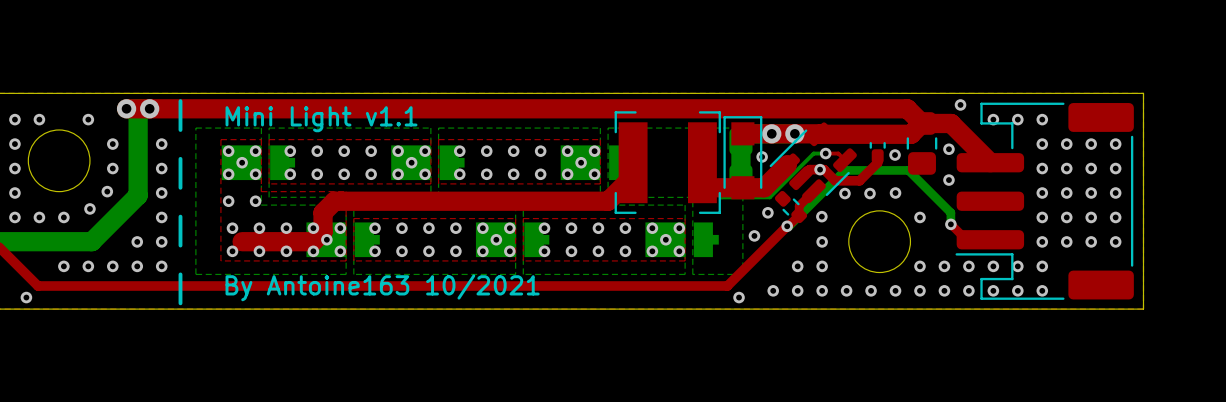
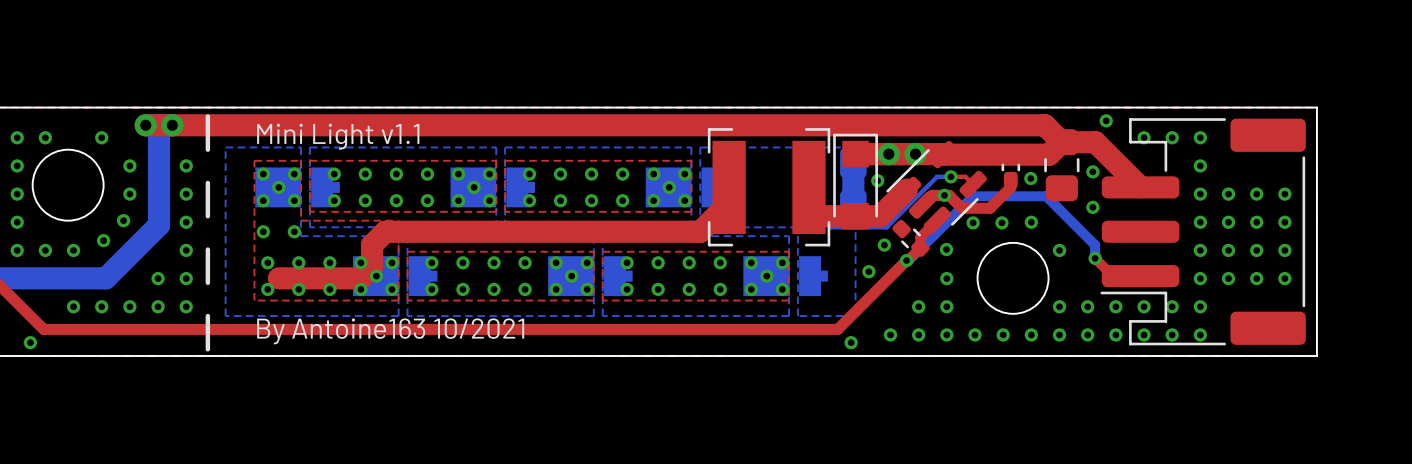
via: (1066, 144) -> none
via: (1091, 144) -> none
via: (1115, 144) -> none

